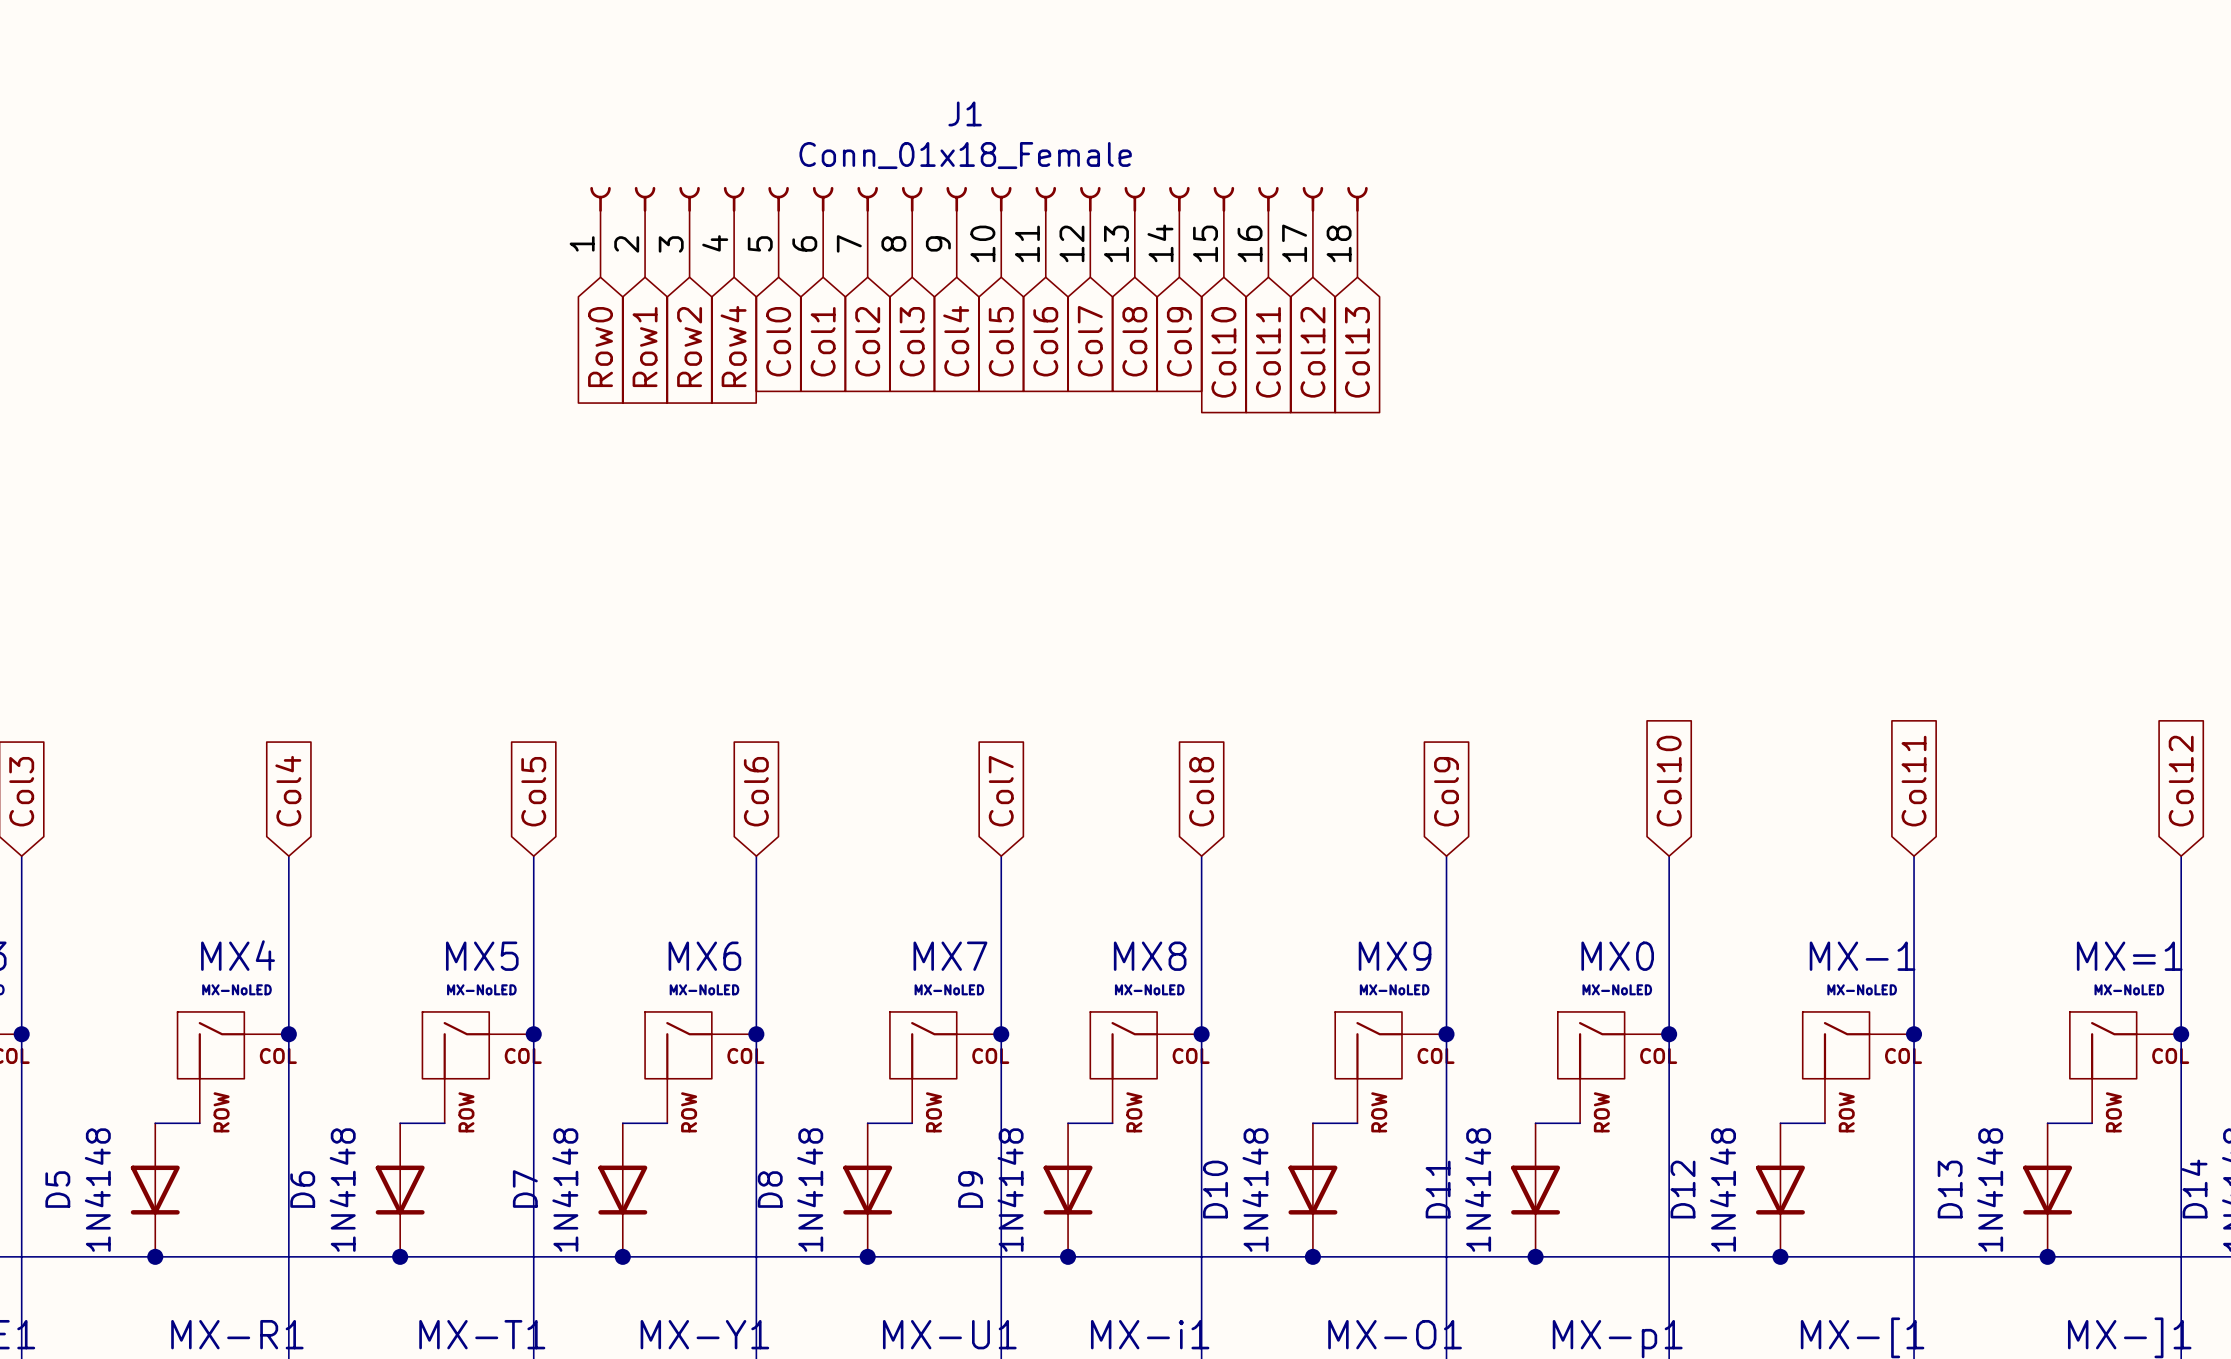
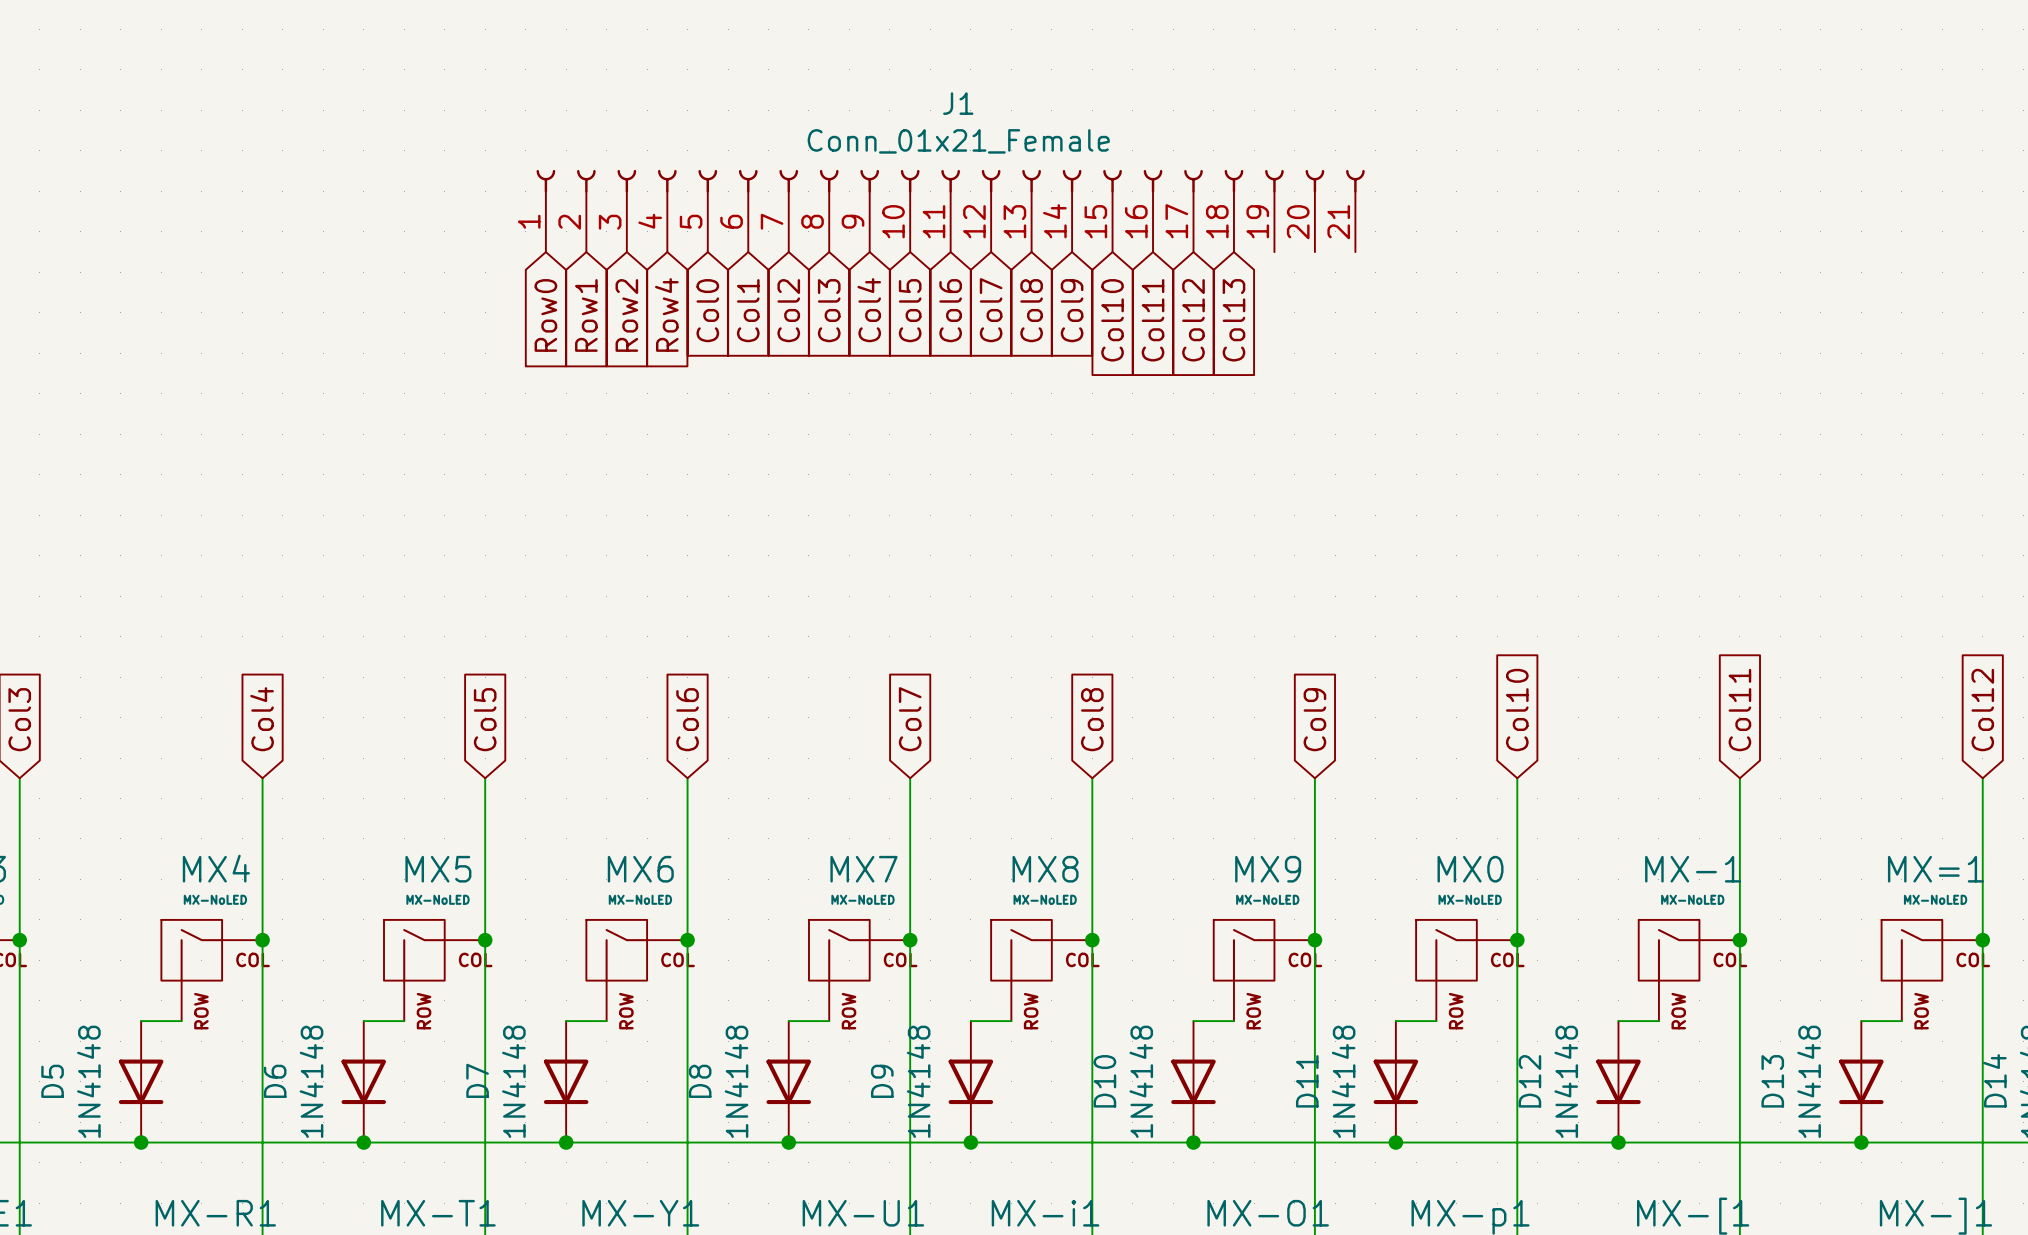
J1 value: Conn_01x18_Female (965, 155) -> Conn_01x21_Female (958, 141)
J1 symbol: [590, 186, 1368, 278] -> [536, 169, 1365, 253]

